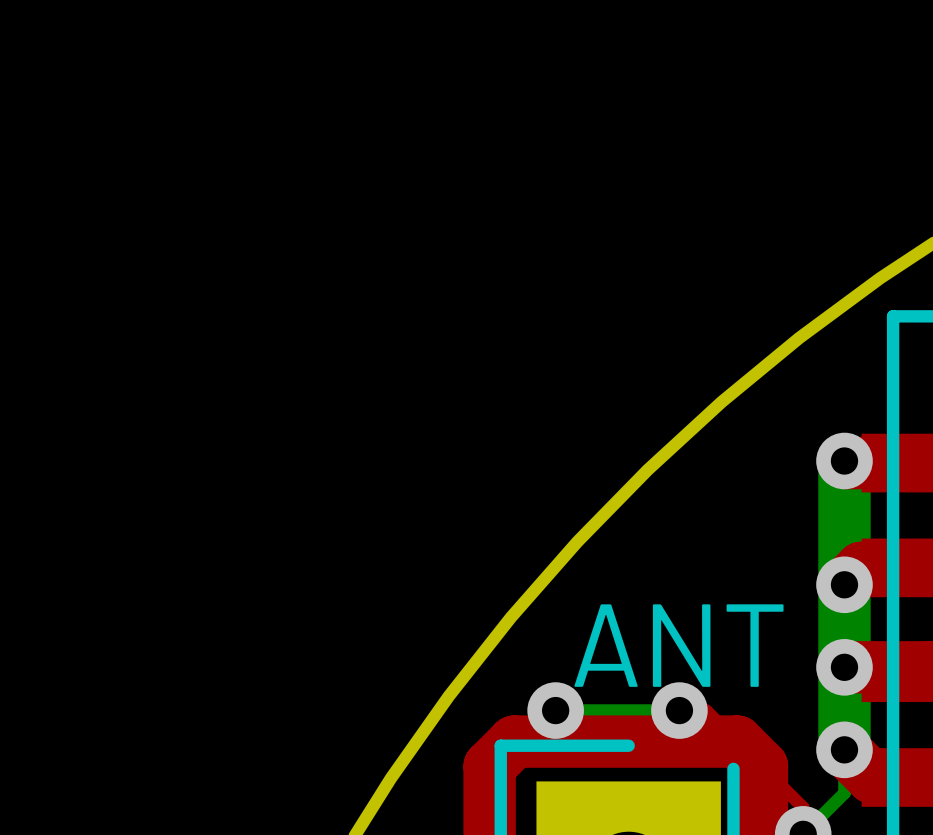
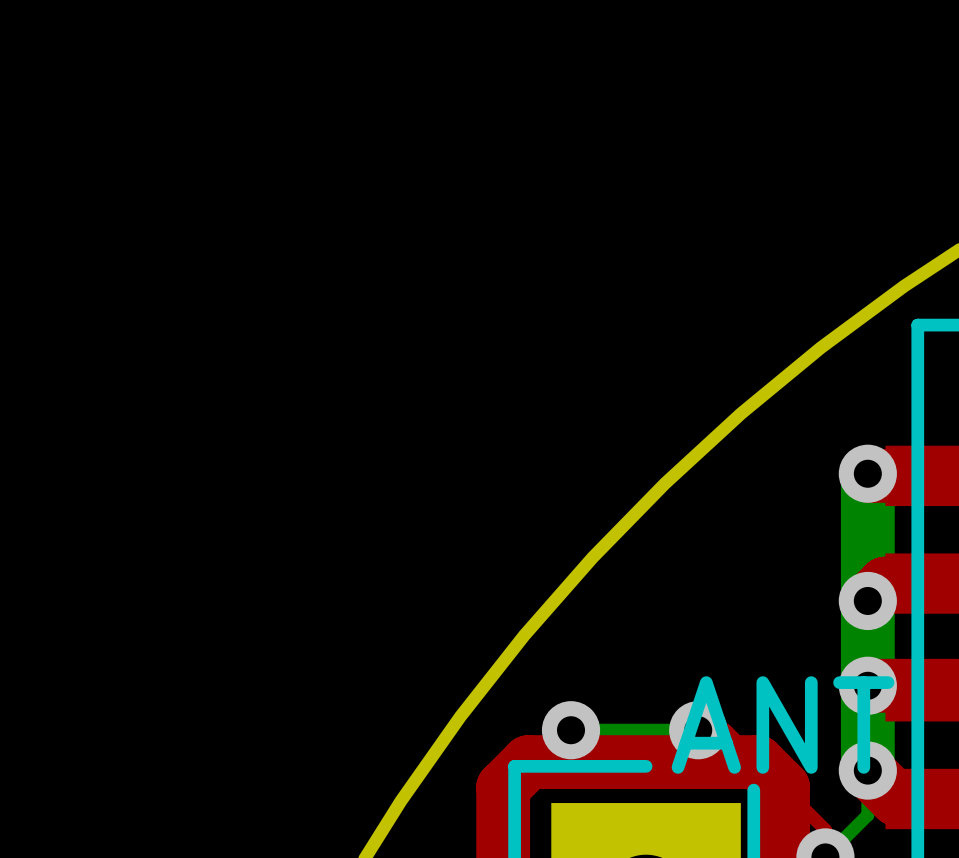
part value position: ANT (678, 645) -> ANT (783, 725)

